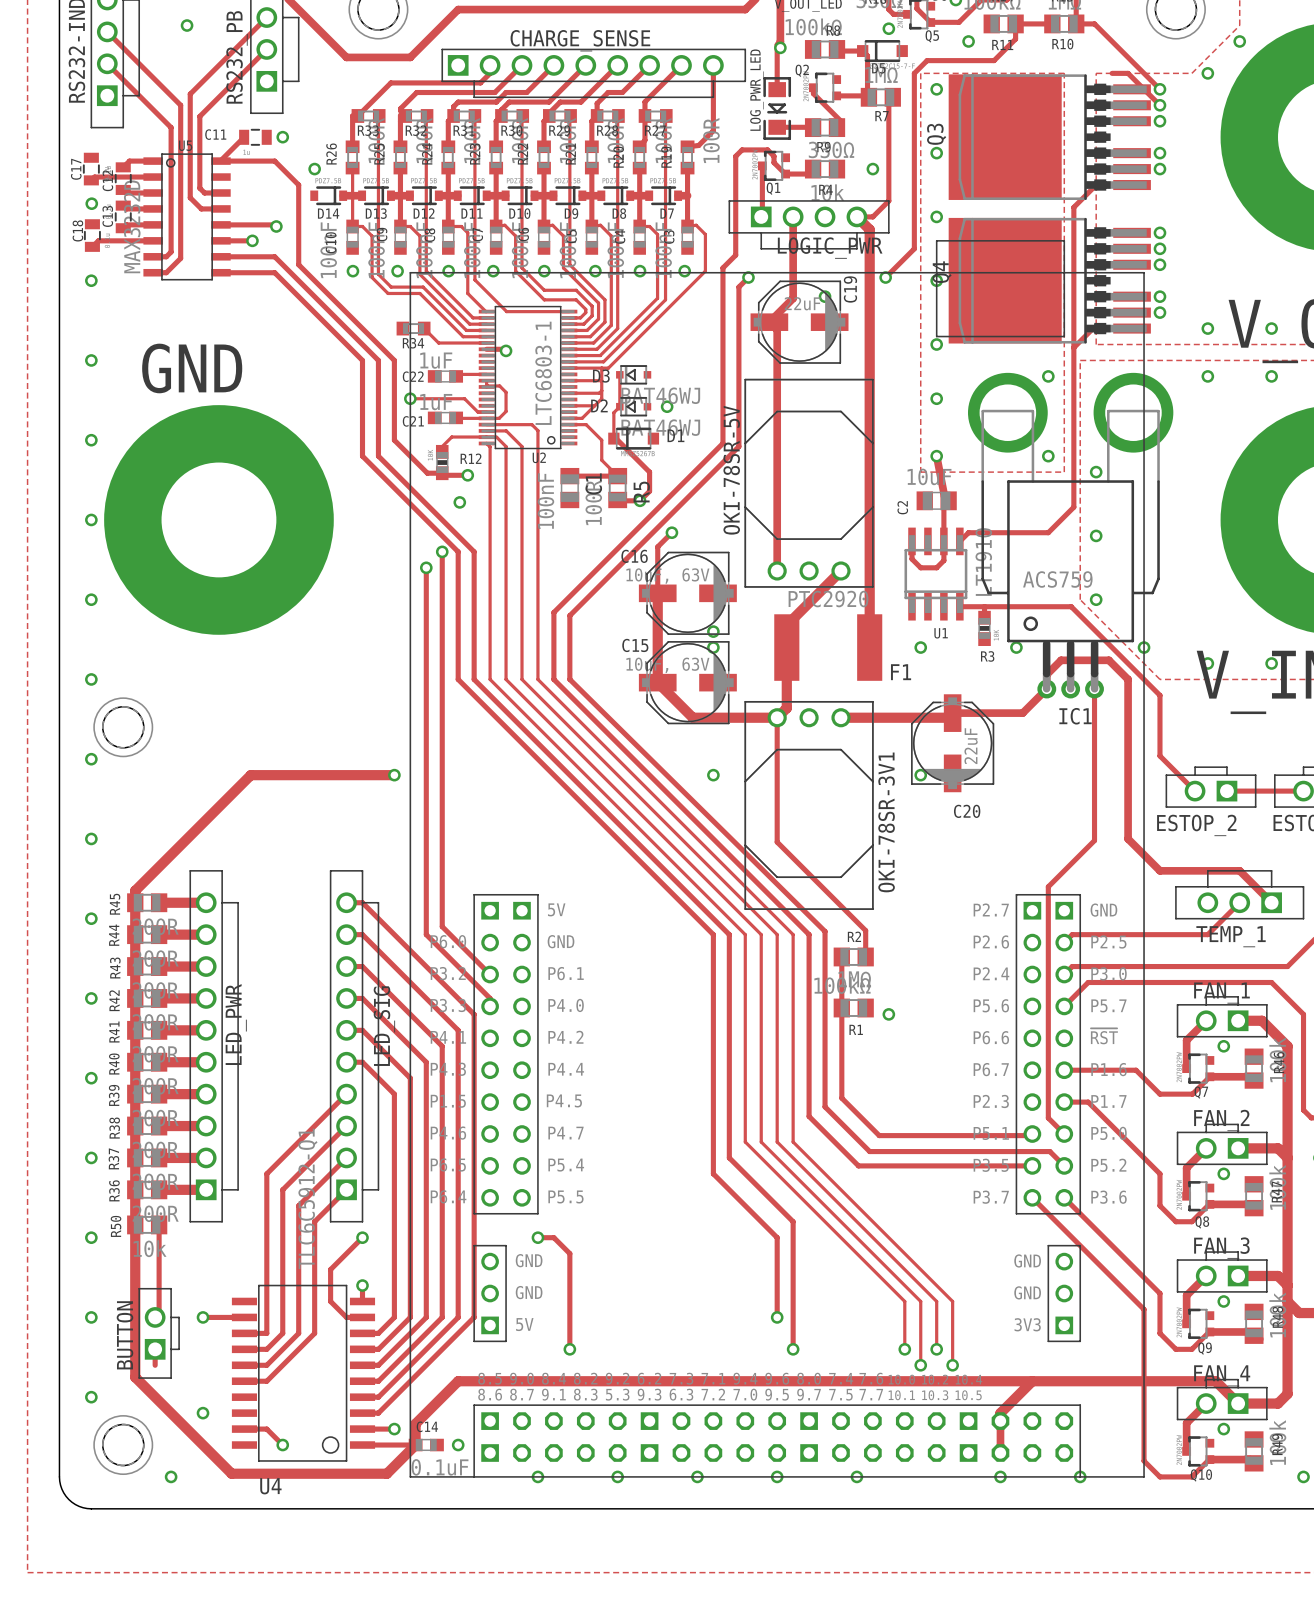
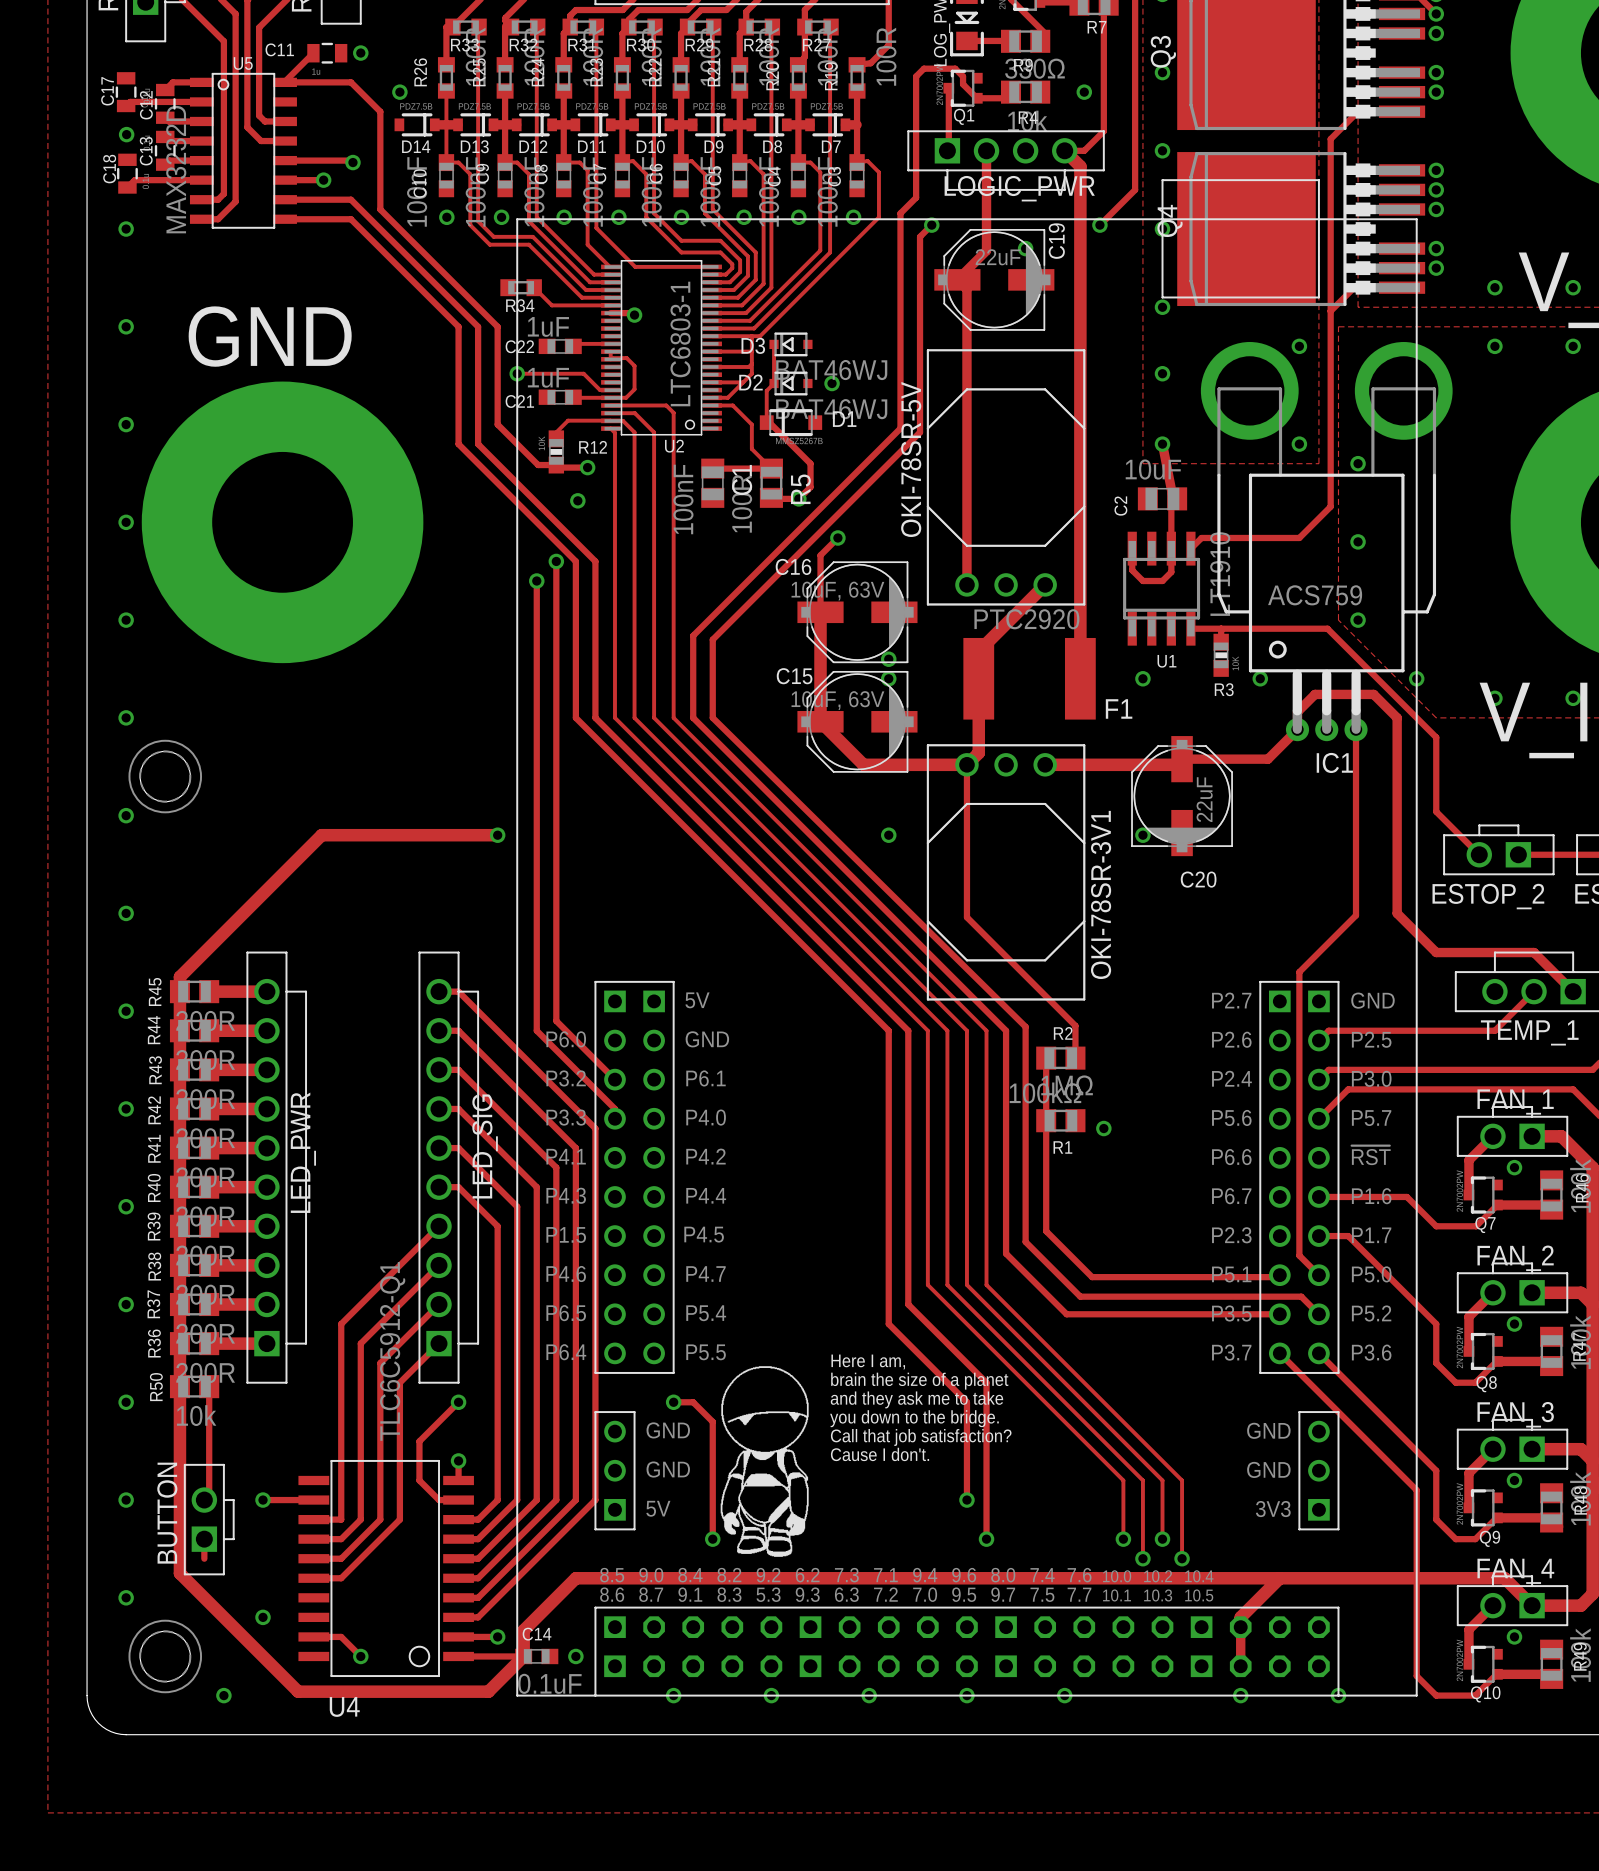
text: none -> Here I am, (868, 1361)
drawing: none -> [720, 1366, 809, 1557]
text: none -> brain the size of a planet (919, 1381)
text: none -> and they ask me to take (916, 1399)
text: none -> you down to the bridge. (914, 1418)
text: none -> Call that job satisfaction? (921, 1437)
text: none -> Cause I don't. (880, 1454)

